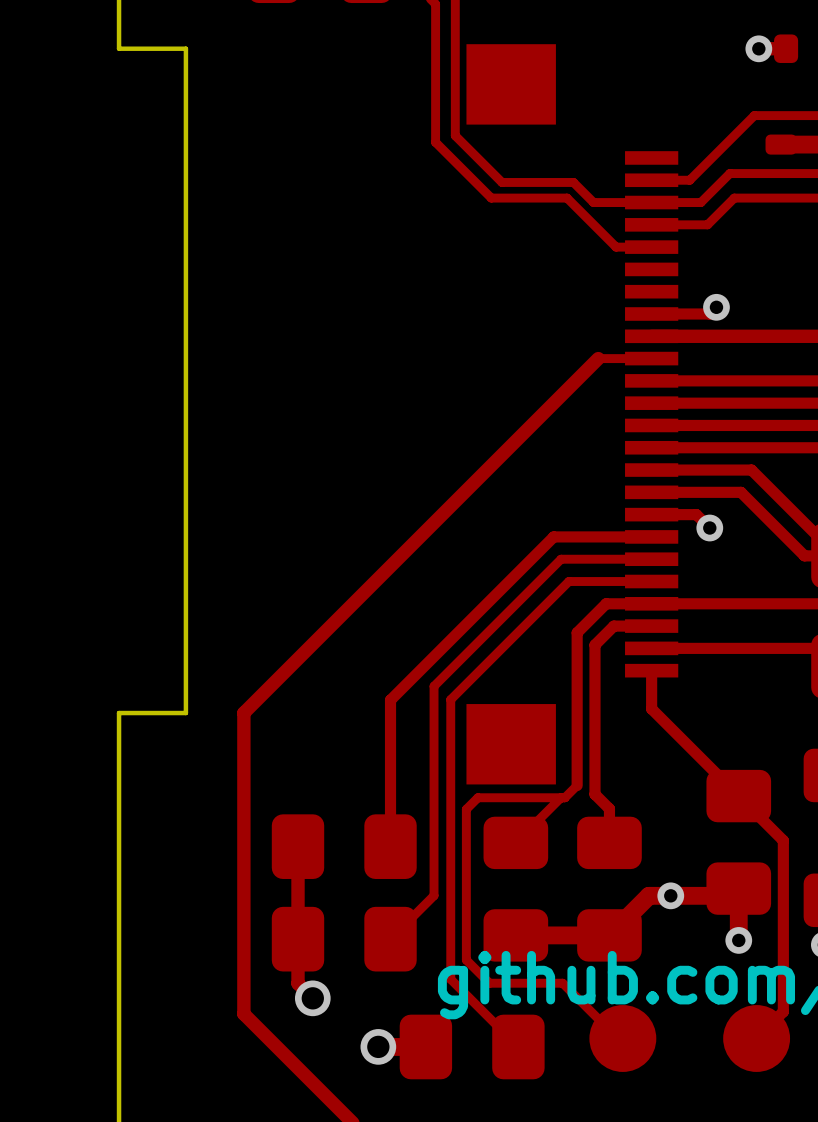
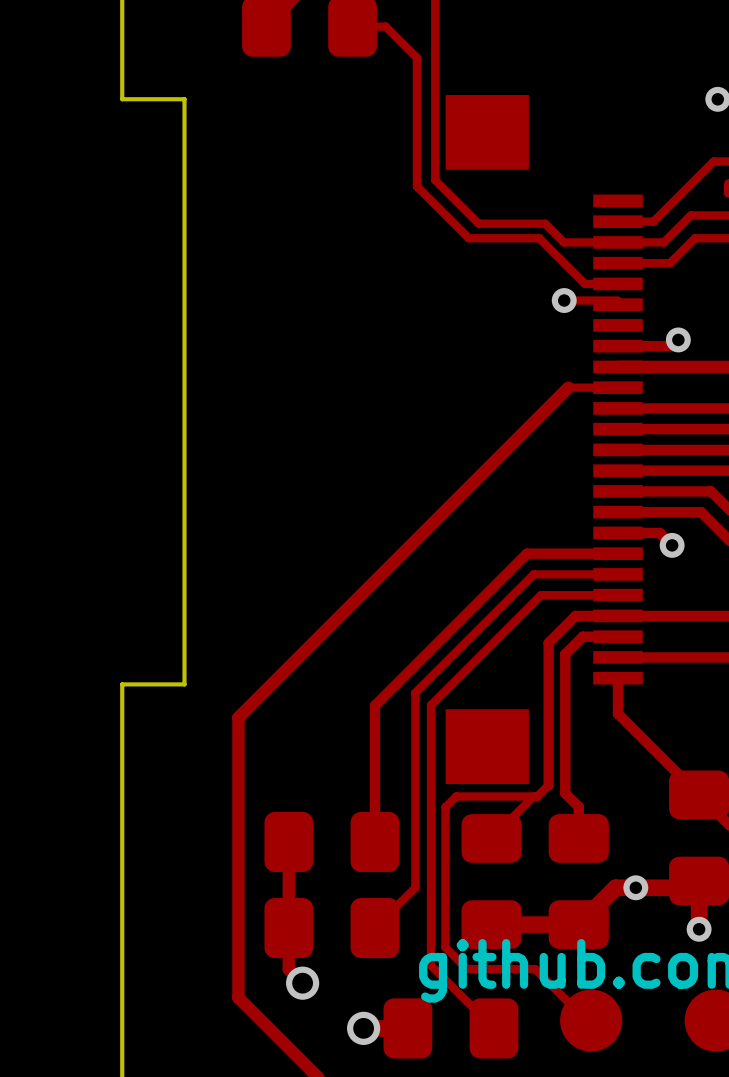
via: none -> (564, 300)
top track: none -> (618, 300) (564, 300)
board edge: (185, 677) (185, 713) (119, 713) -> (184, 684) (122, 684) (122, 717)

